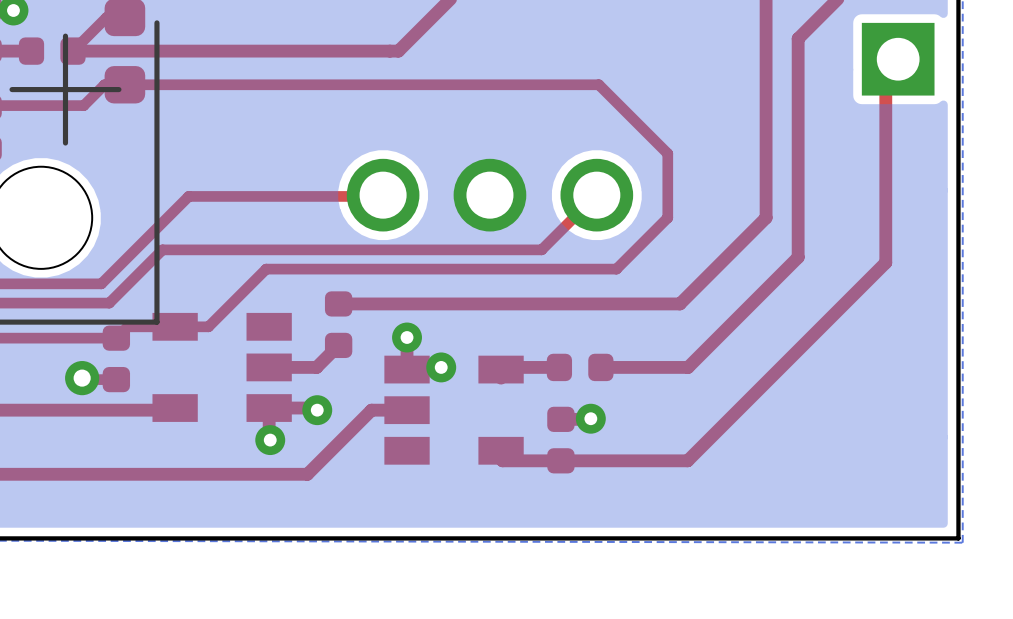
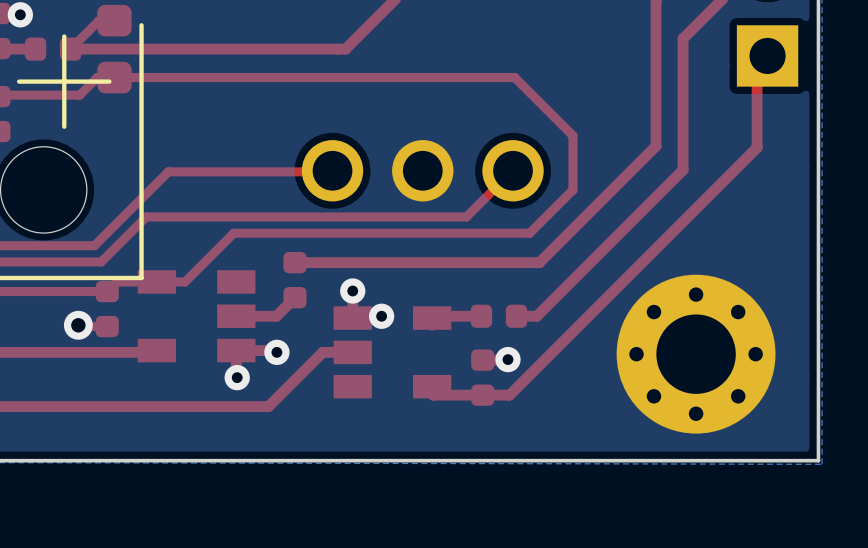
top track: (766, 166) (766, 217) (679, 303) (628, 303) -> (656, 146) (539, 262)
top track: (885, 167) (885, 262) (687, 460) (592, 460) -> (757, 147) (509, 395)
top track: (798, 194) (798, 257) (688, 367) (625, 367) -> (683, 170) (536, 316)
part: none -> (696, 354)

